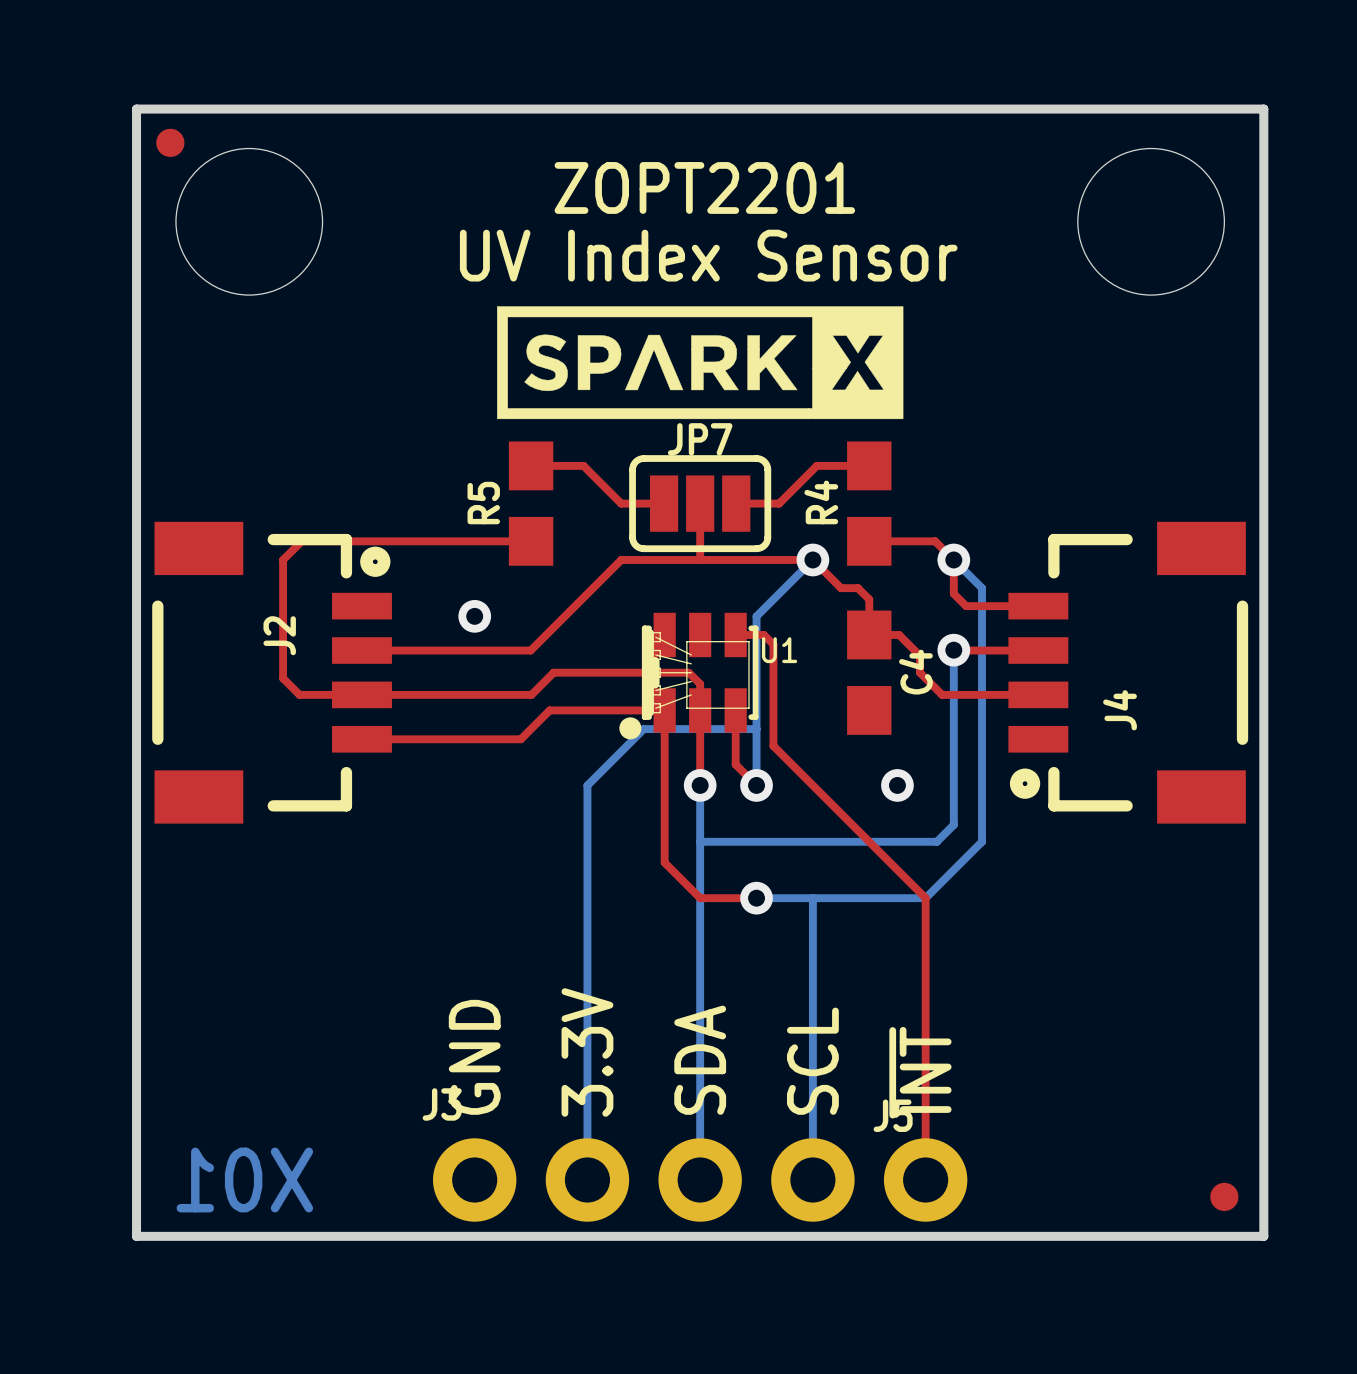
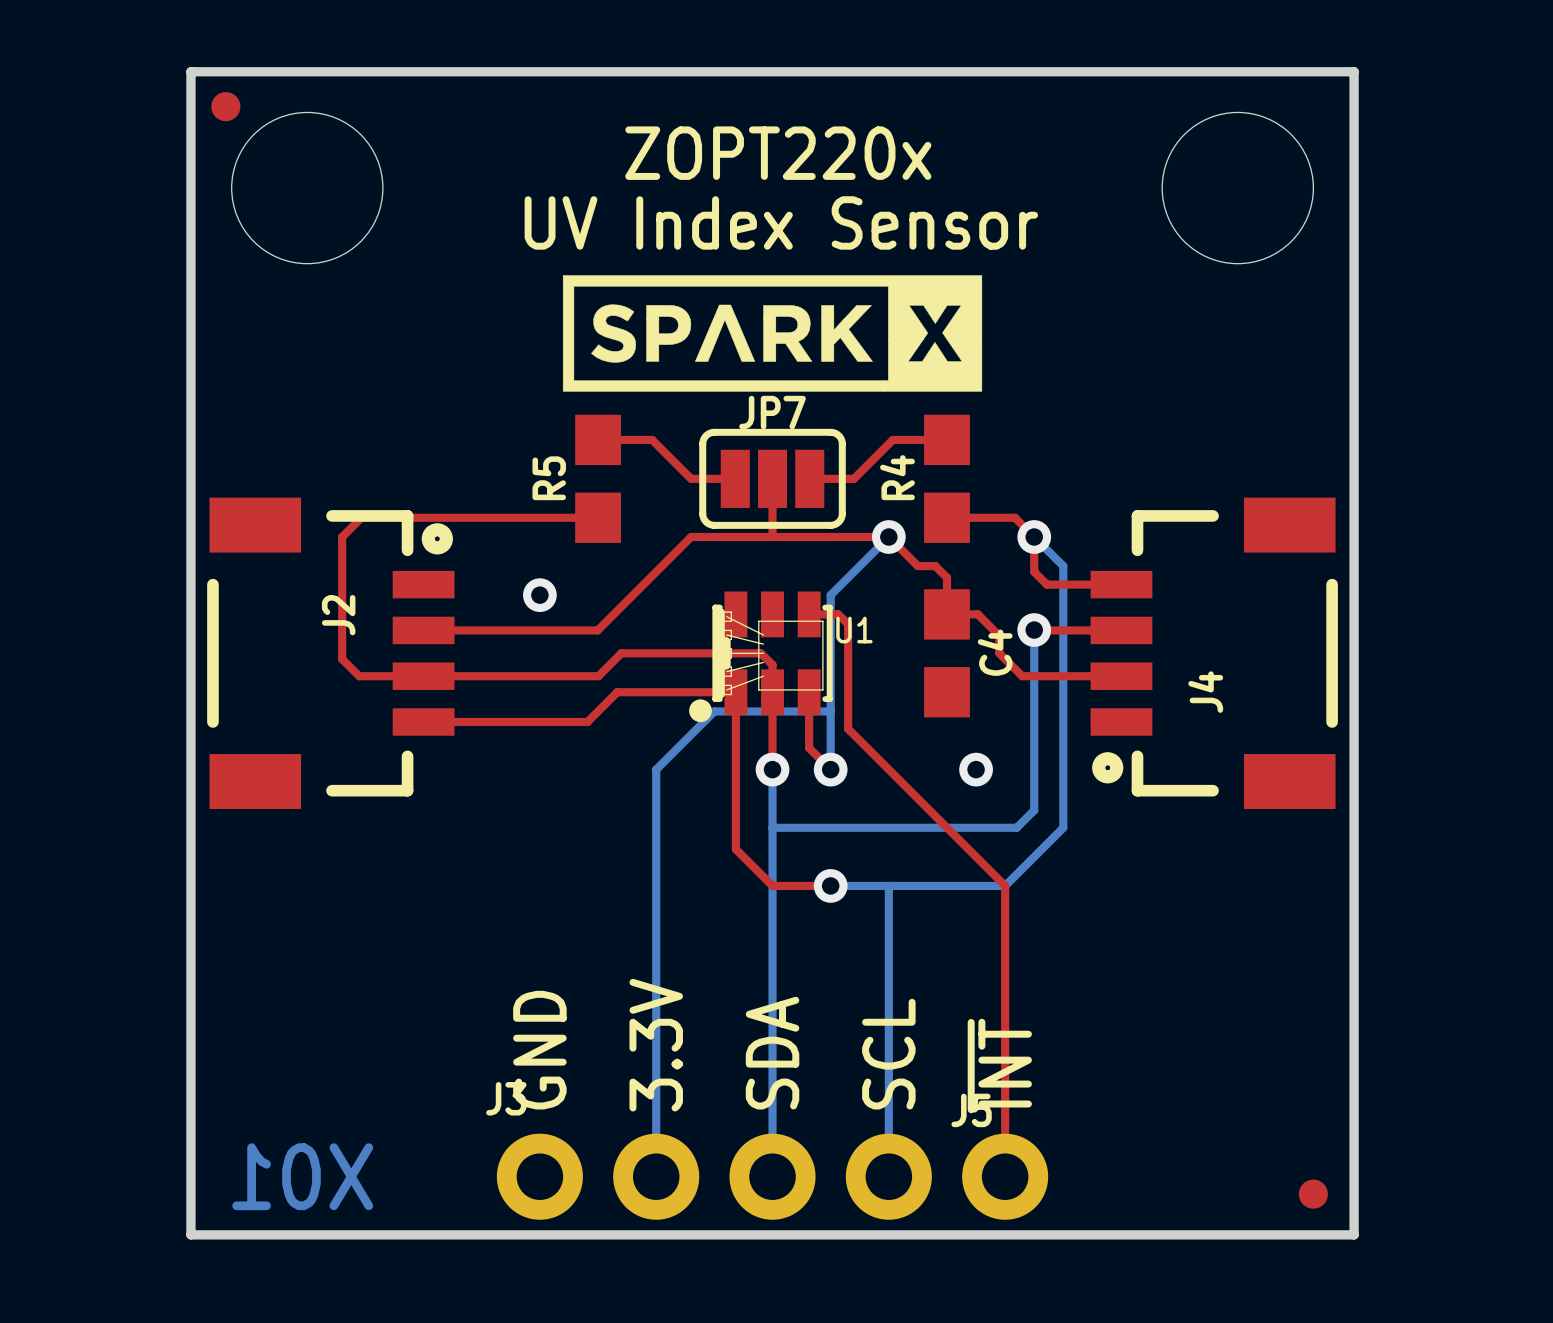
text: ZOPT2201 (704, 187) -> ZOPT220x (778, 153)

